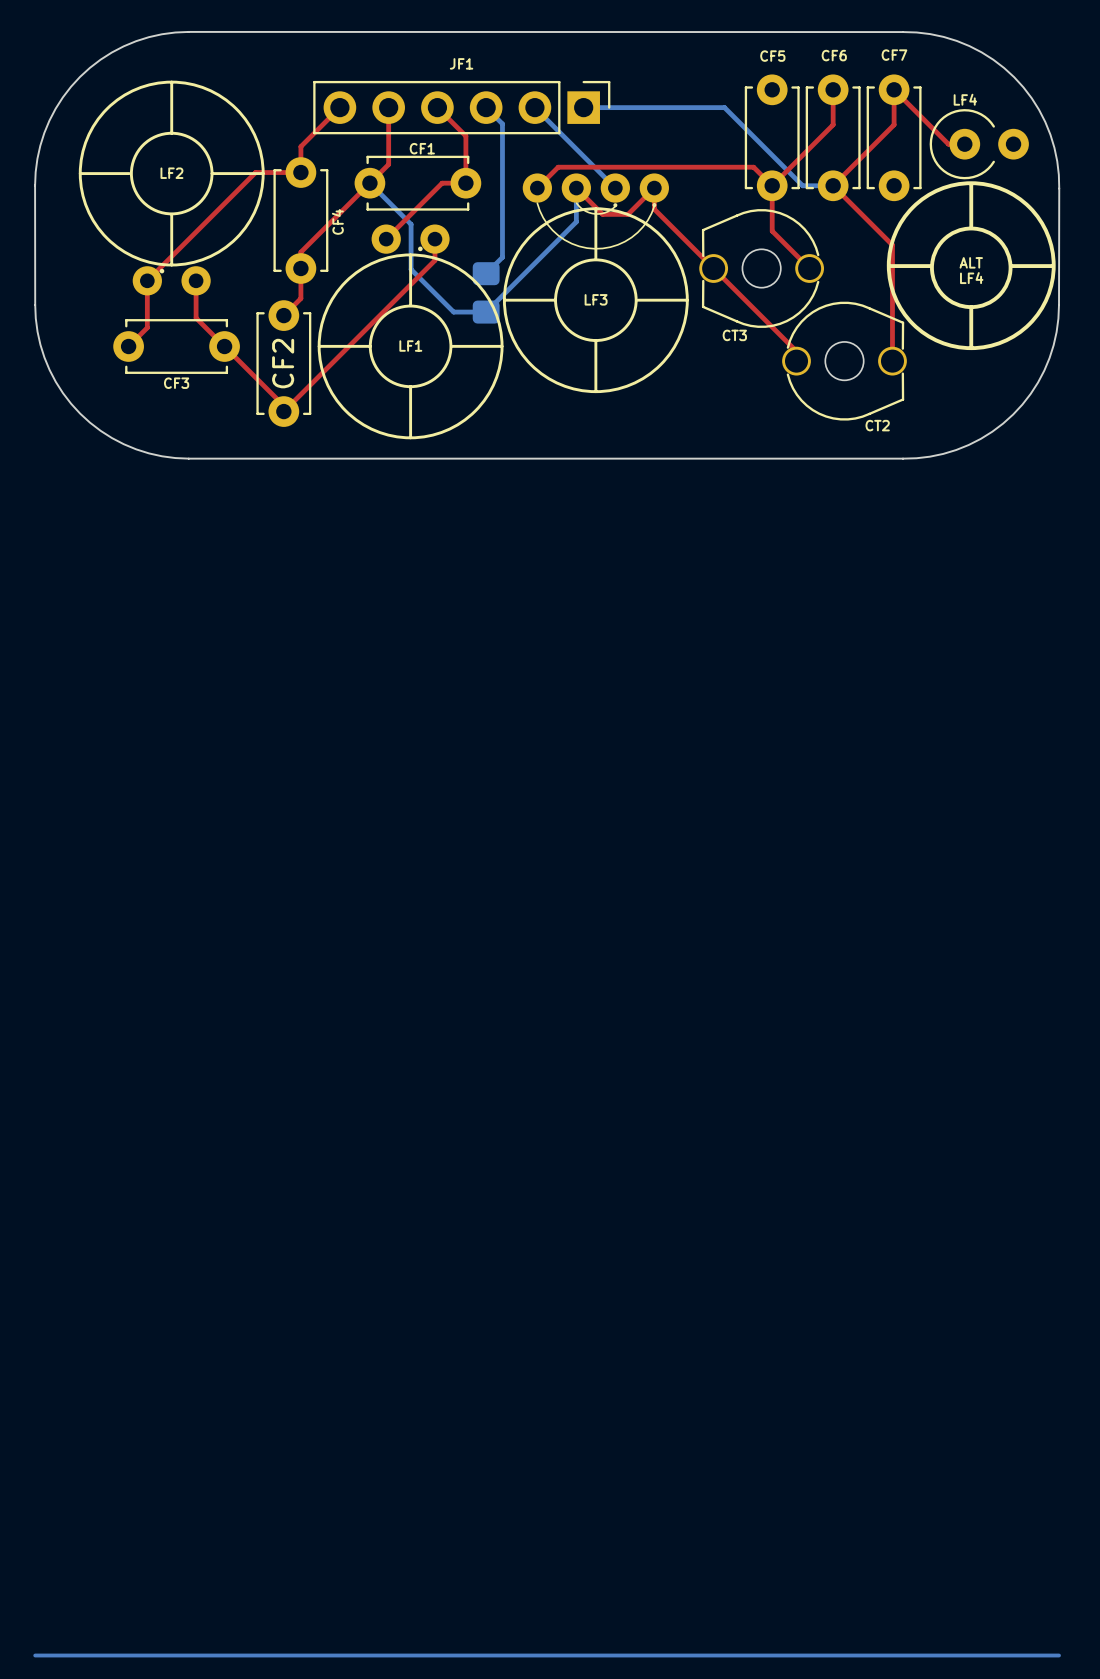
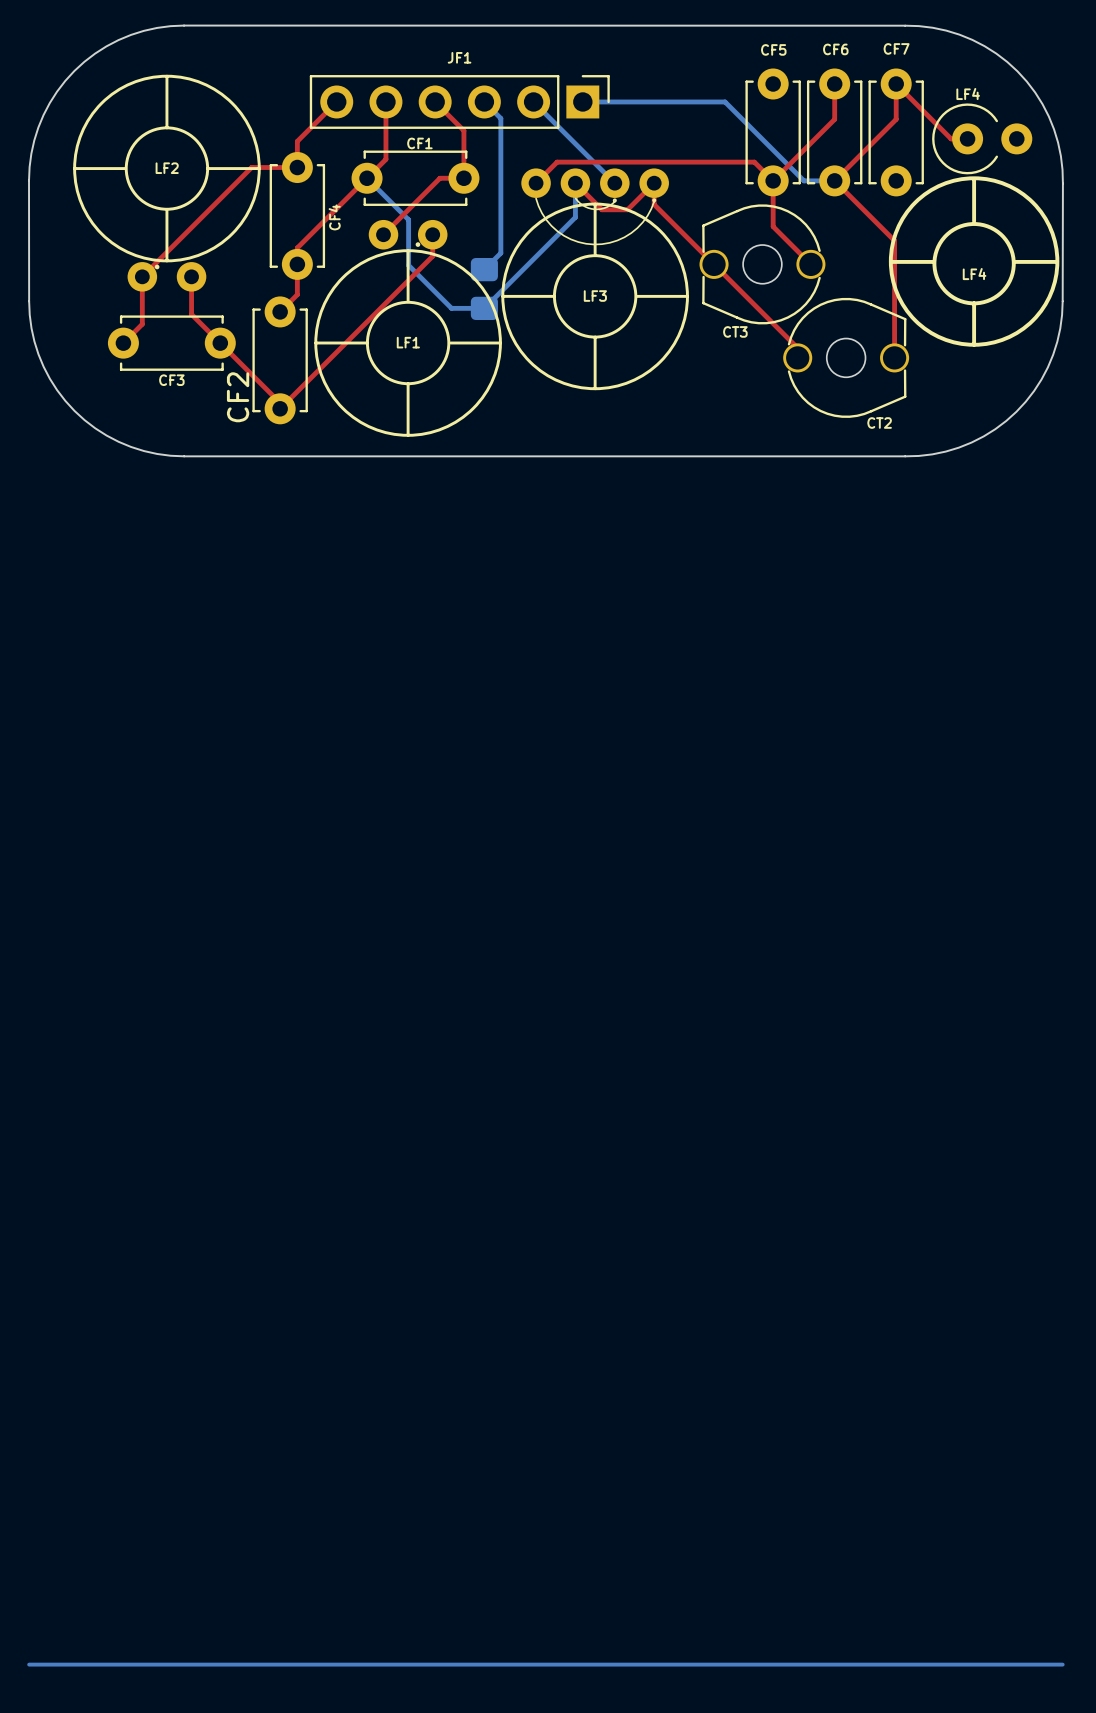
text: ALT (971, 262) -> none
CF2 name position: CF2 (283, 363) -> CF2 (238, 397)

